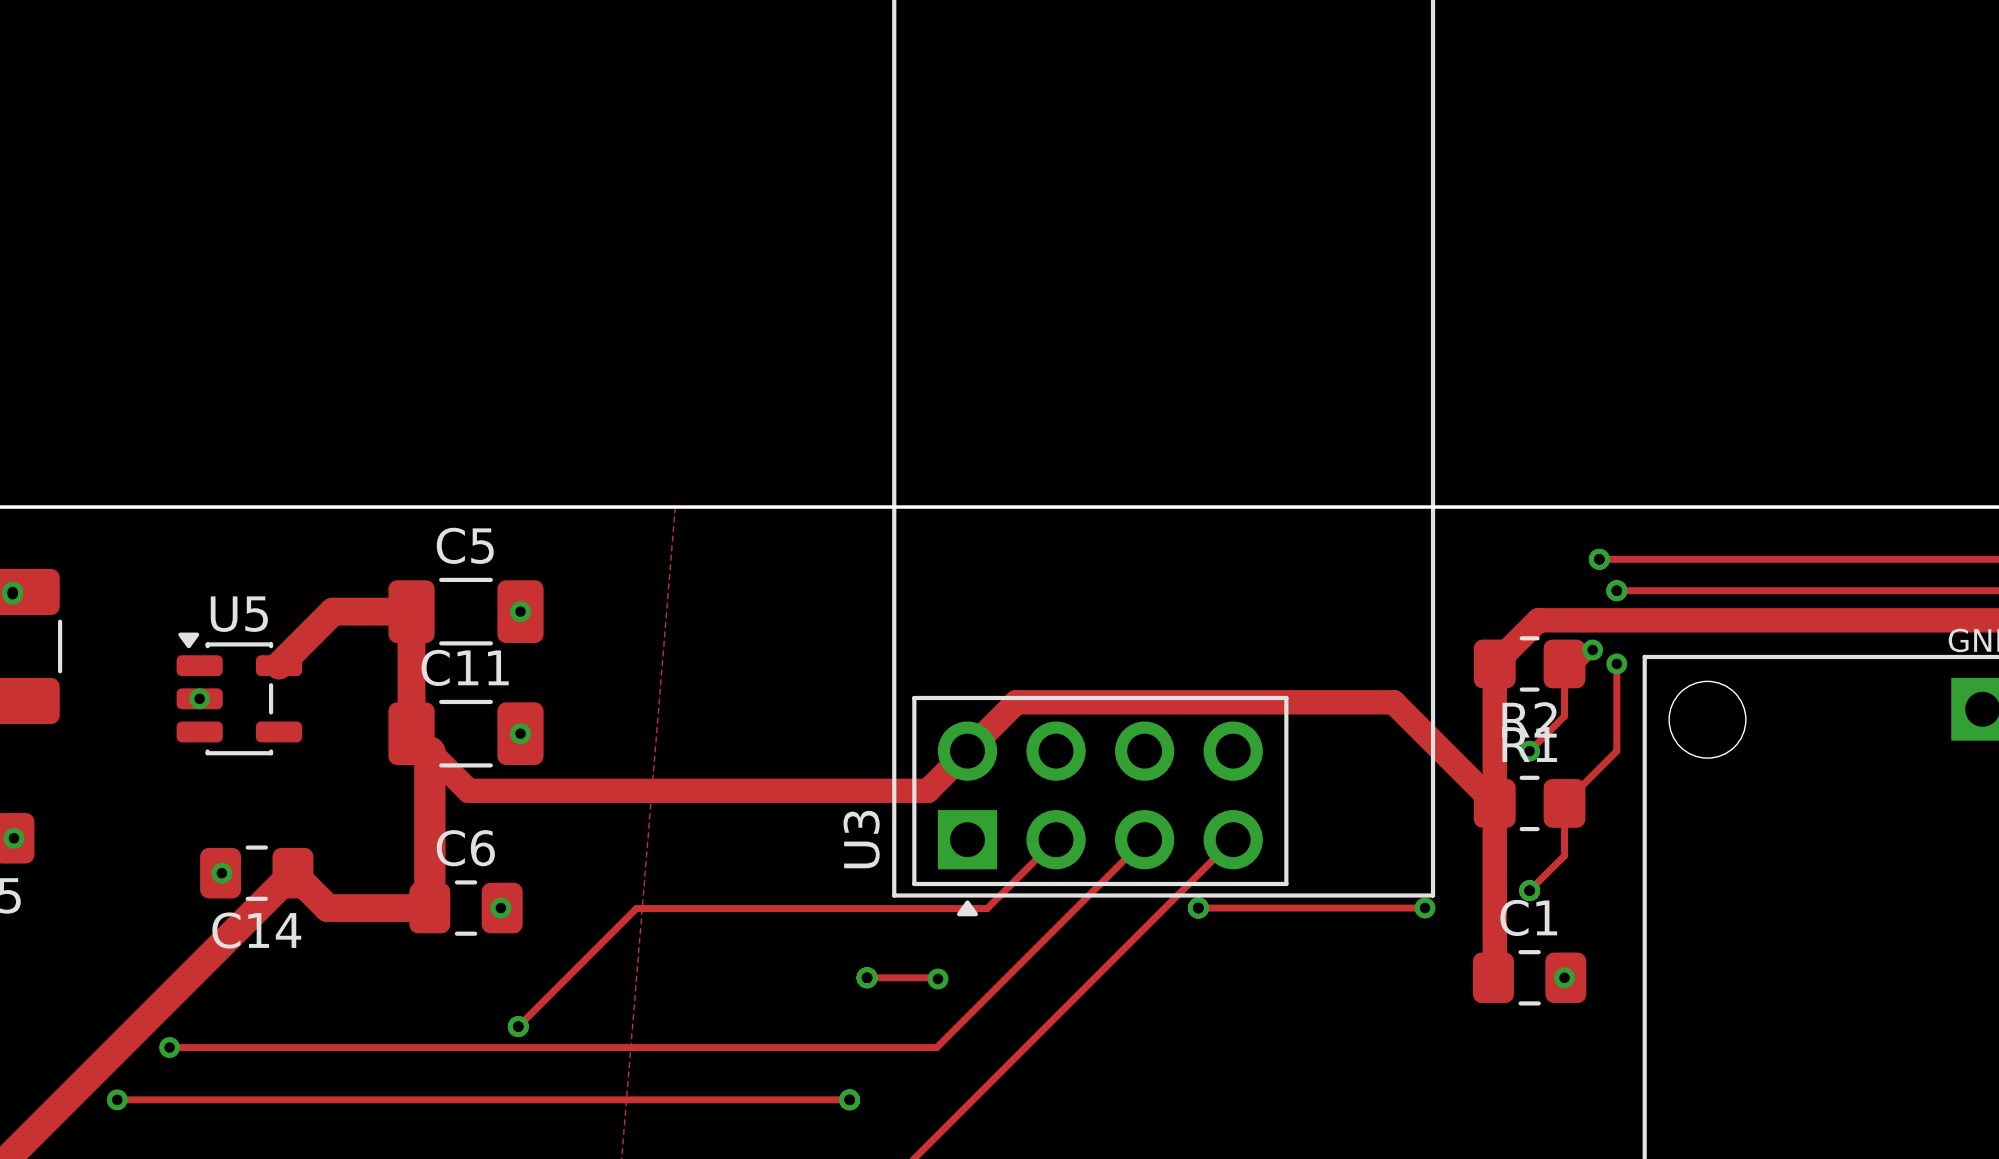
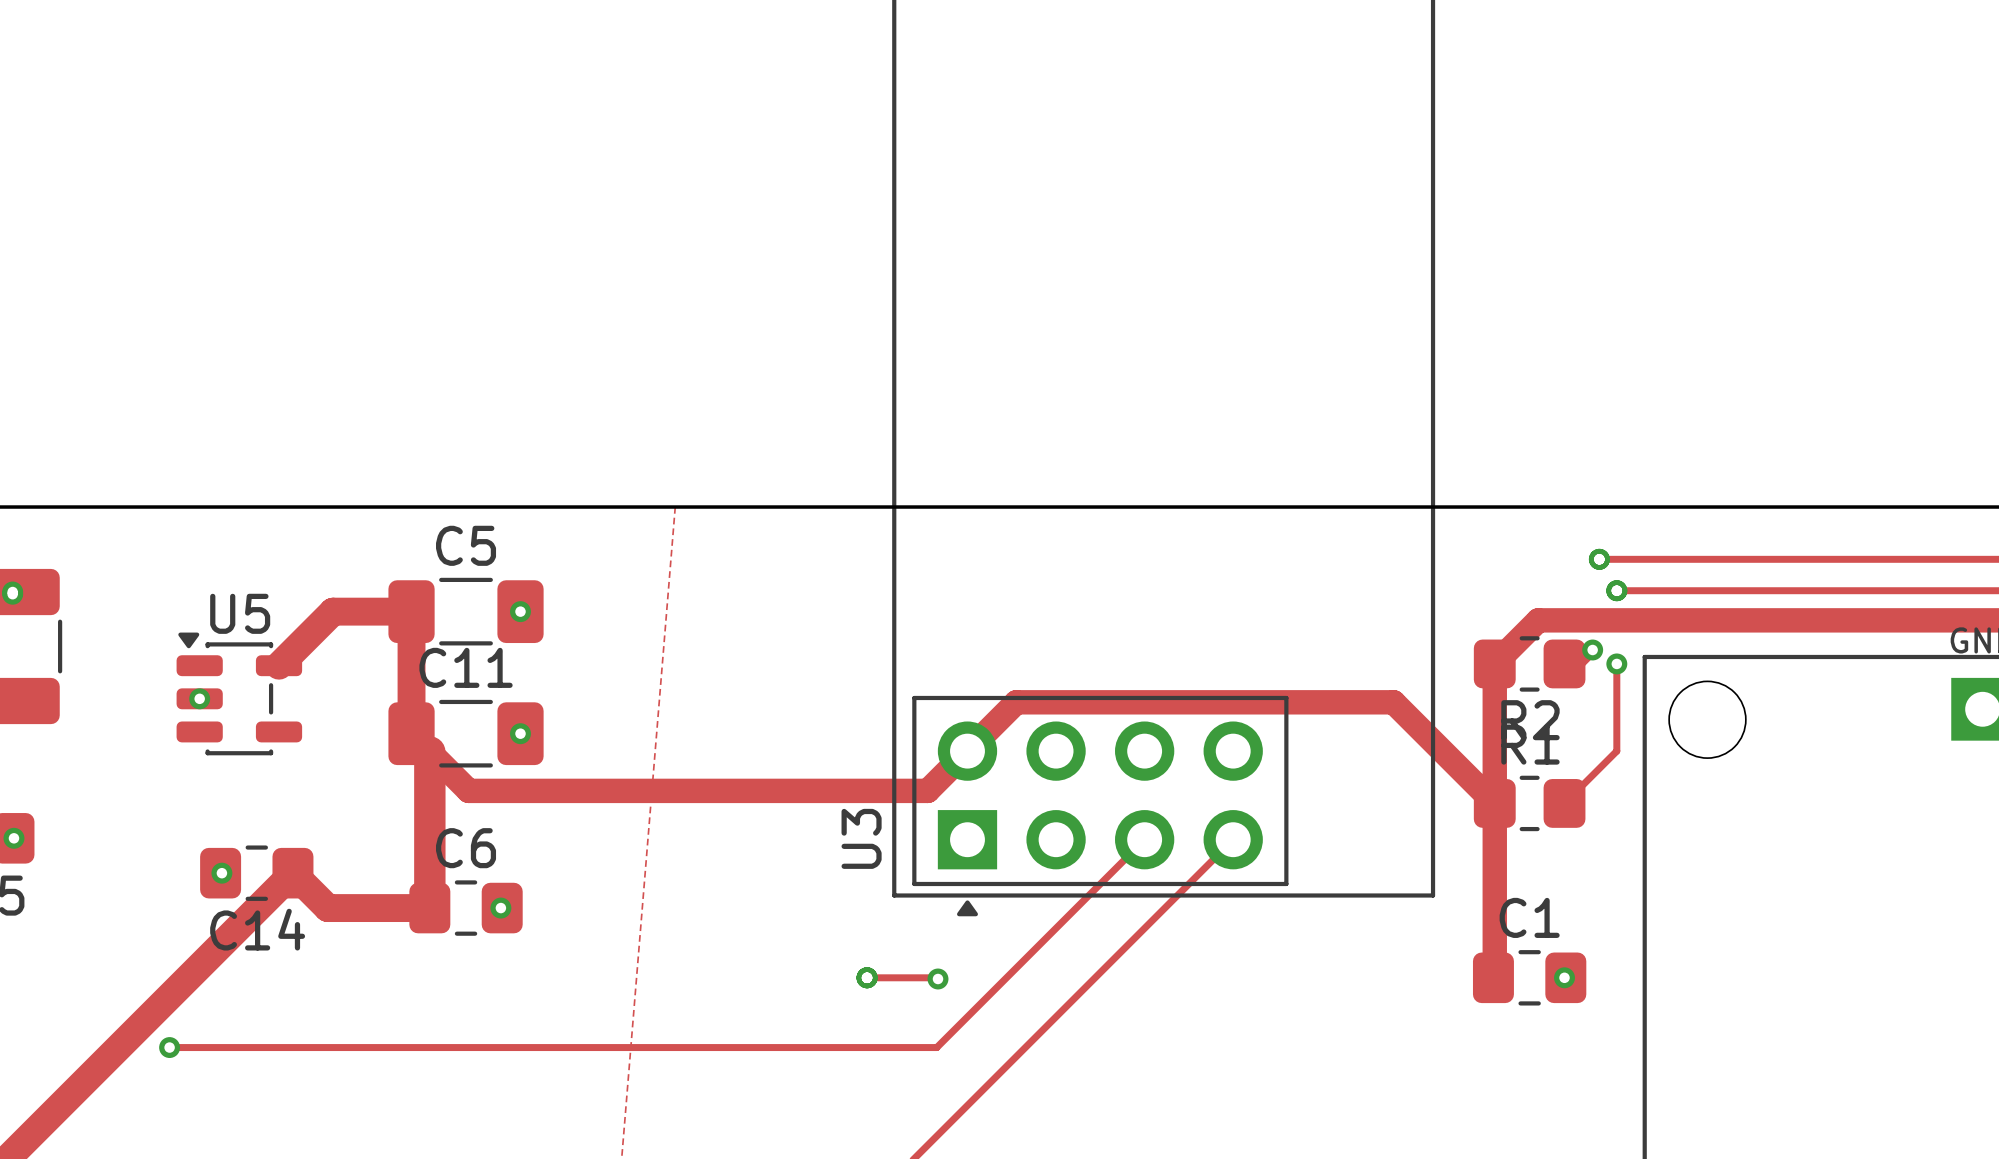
track: (1564, 663) (1564, 716) (1529, 751) -> none
via: (1529, 751) -> none
track: (1564, 803) (1564, 855) (1529, 890) -> none
track: (1056, 839) (987, 908) (636, 908) (518, 1026) -> none
via: (1529, 890) -> none
track: (1198, 908) (1425, 908) -> none
via: (1198, 908) -> none
via: (1425, 908) -> none
via: (518, 1026) -> none
track: (117, 1099) (849, 1099) -> none
via: (117, 1099) -> none
via: (849, 1099) -> none

